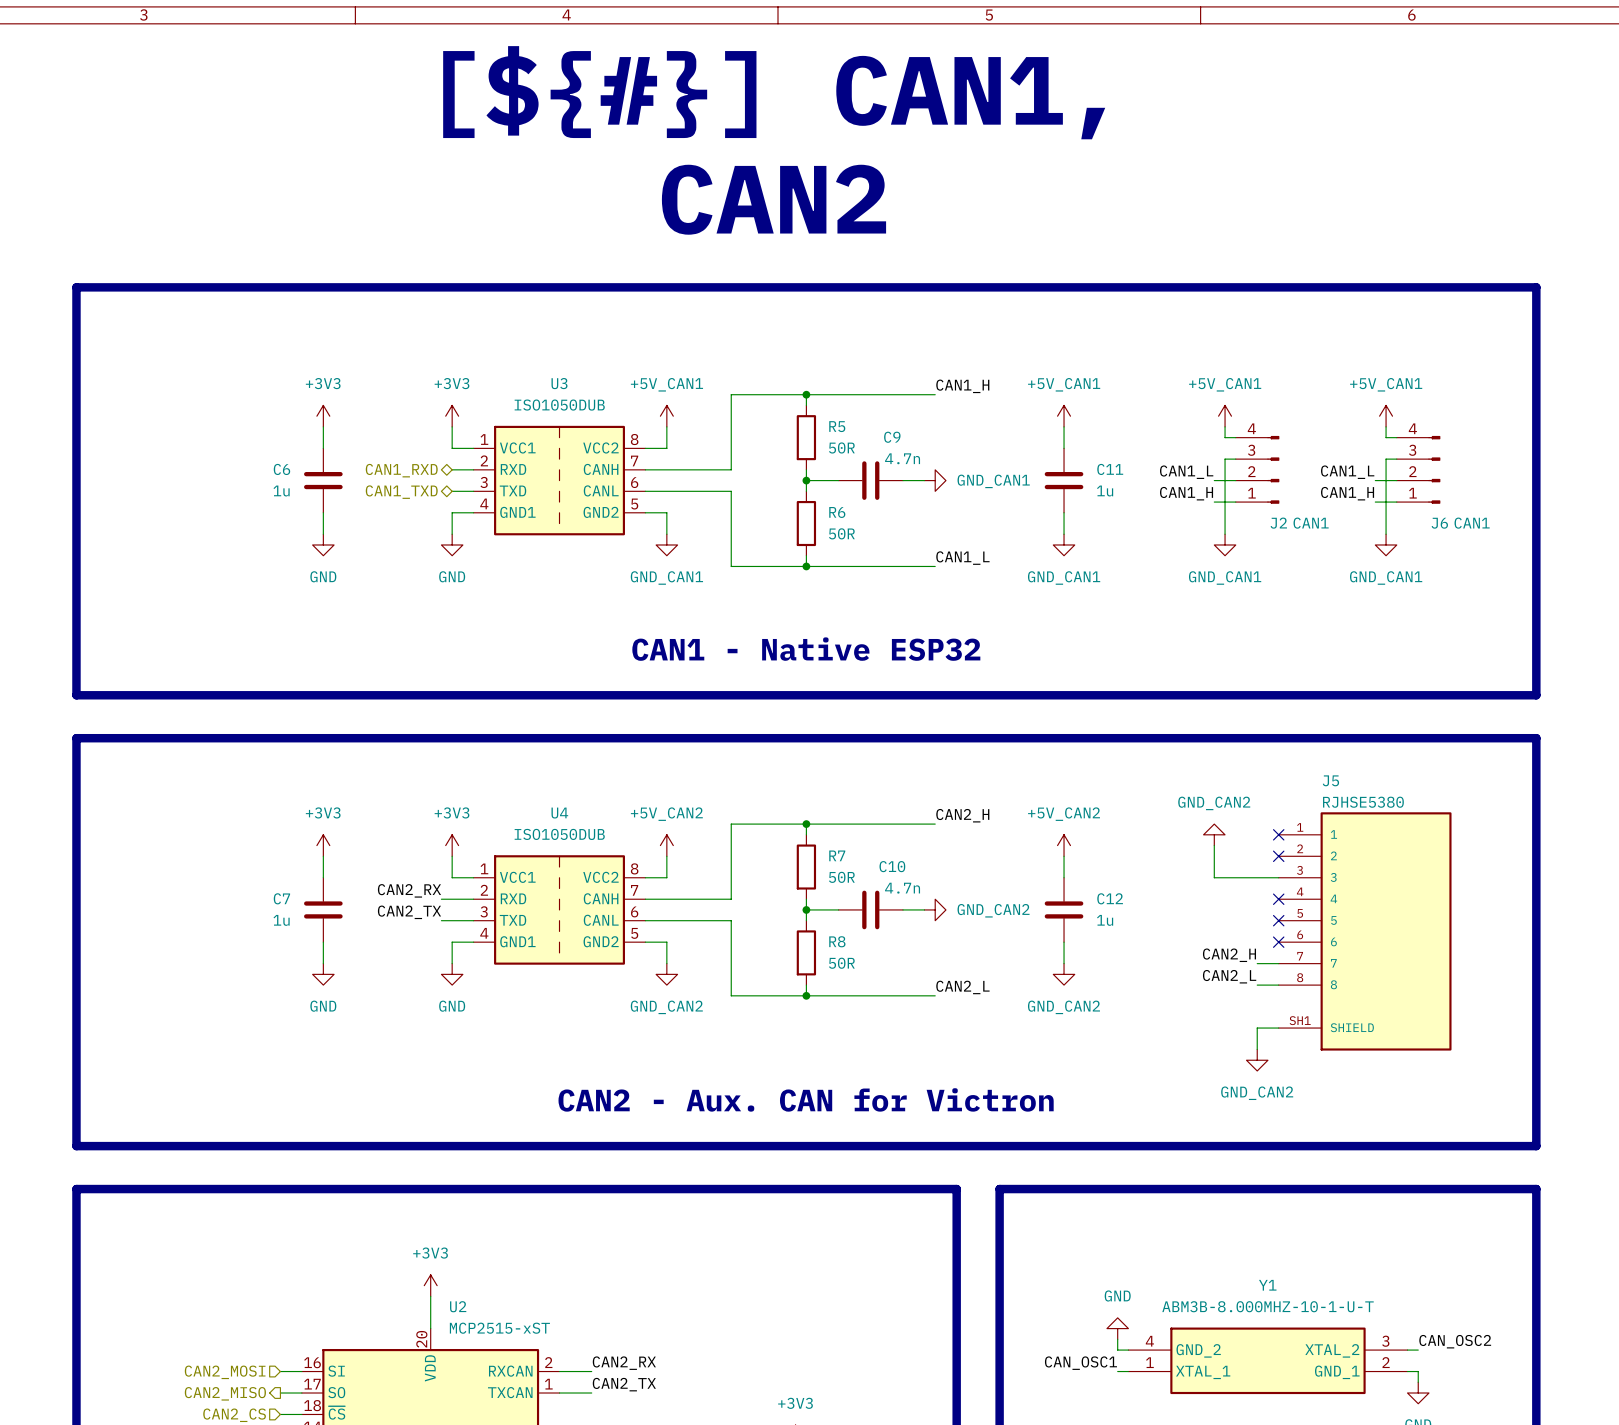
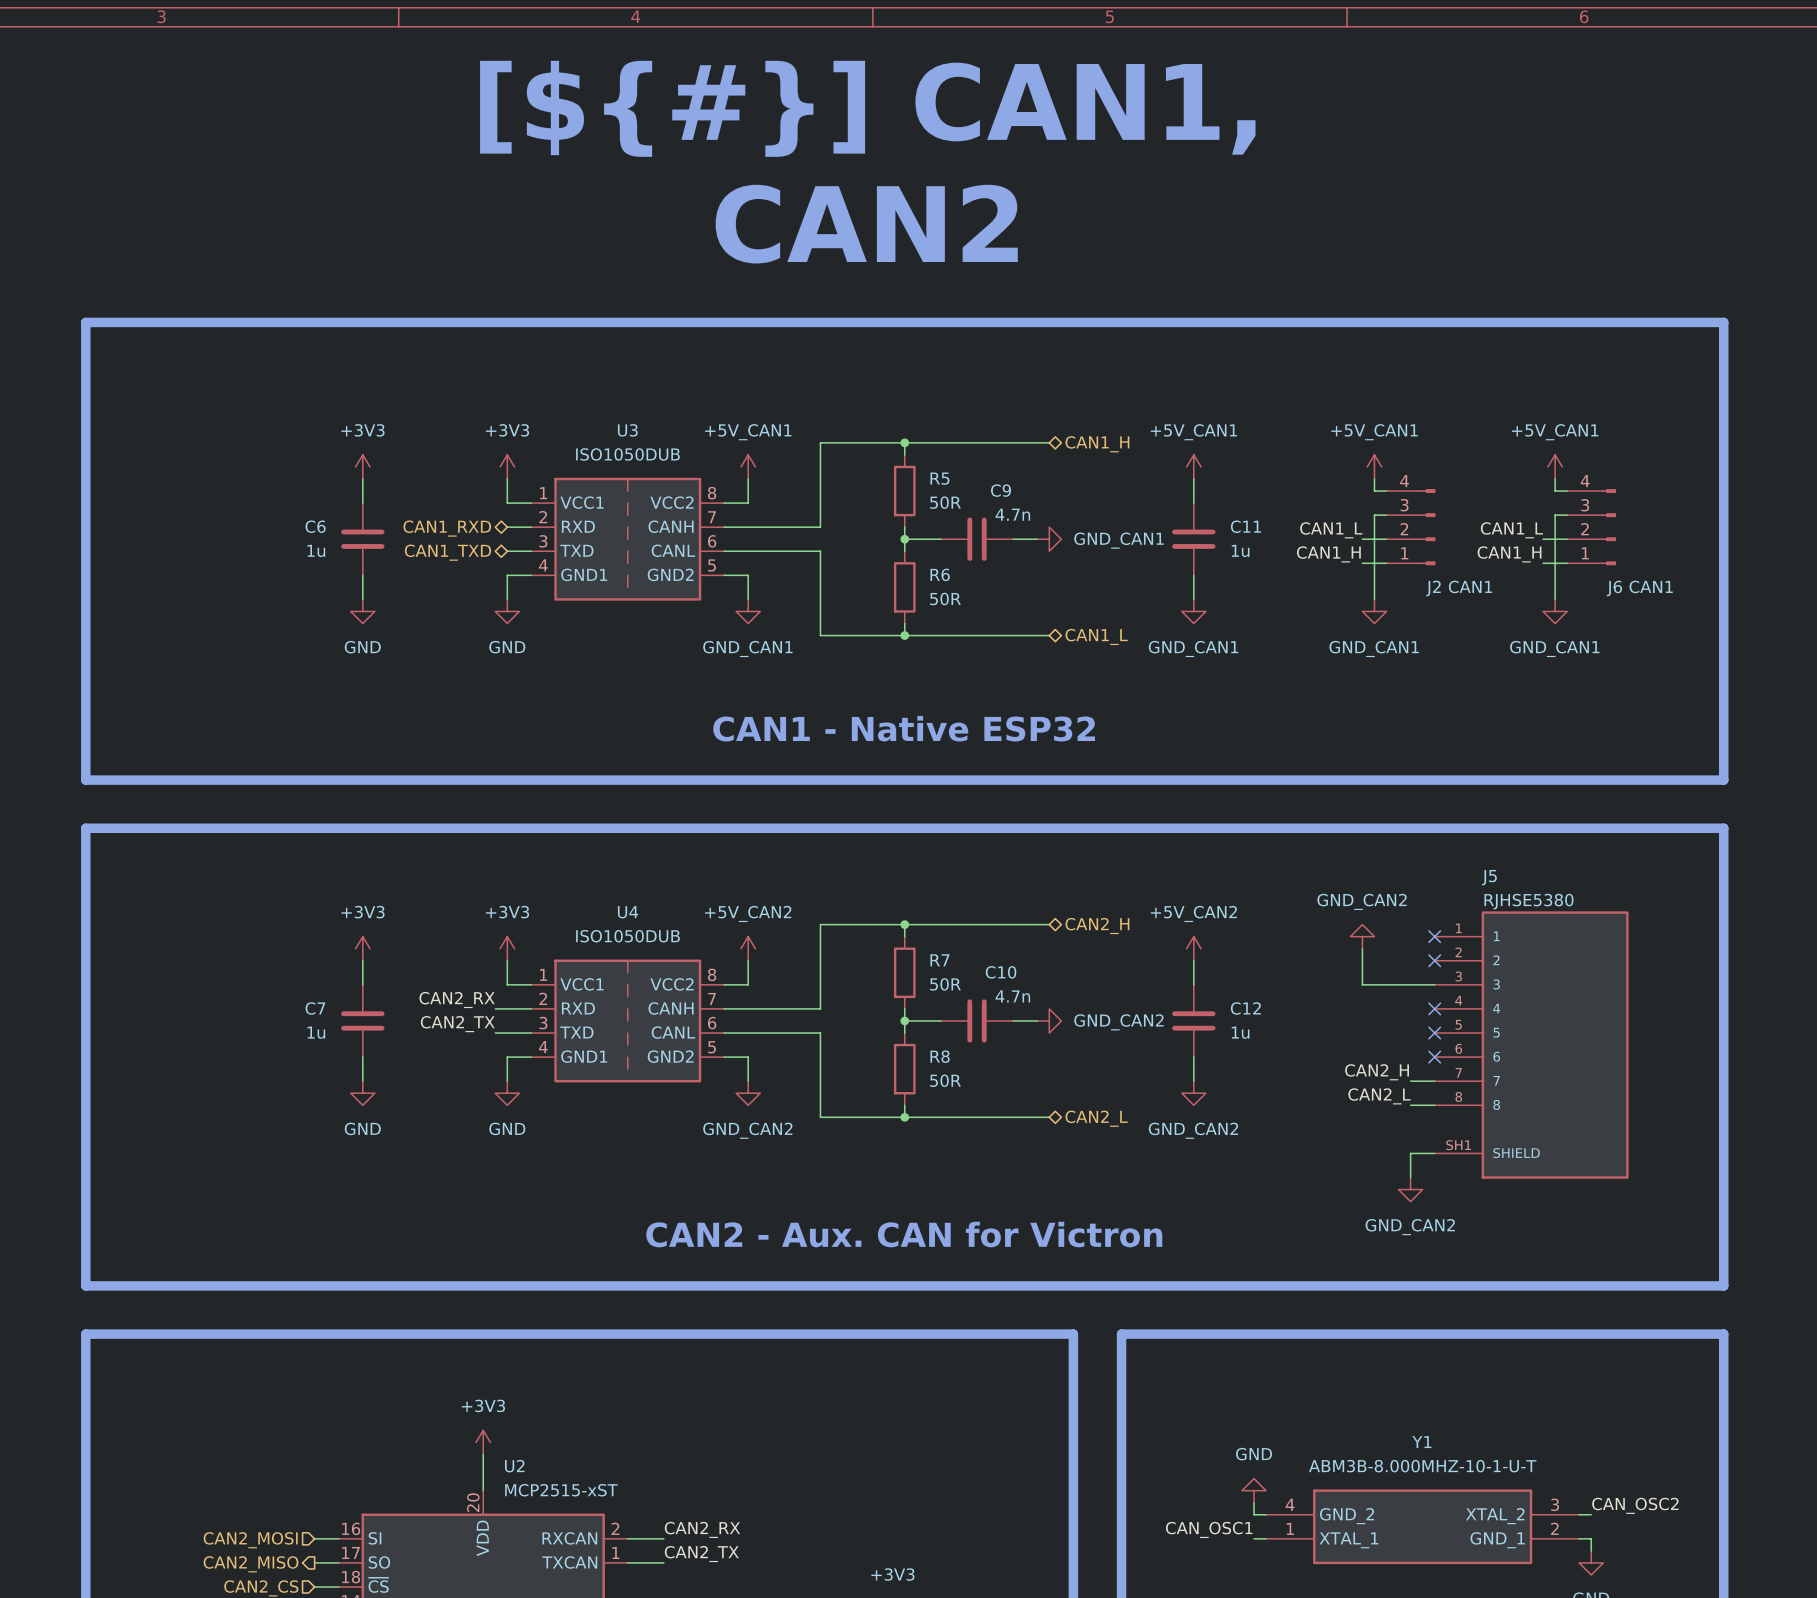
label: CAN1_H (962, 386) -> none
hierarchical label: none -> CAN1_H (1097, 444)
label: CAN1_L (962, 558) -> none
hierarchical label: none -> CAN1_L (1096, 636)
label: CAN2_H (962, 815) -> none
hierarchical label: none -> CAN2_H (1097, 926)
label: CAN2_L (962, 987) -> none
hierarchical label: none -> CAN2_L (1096, 1118)

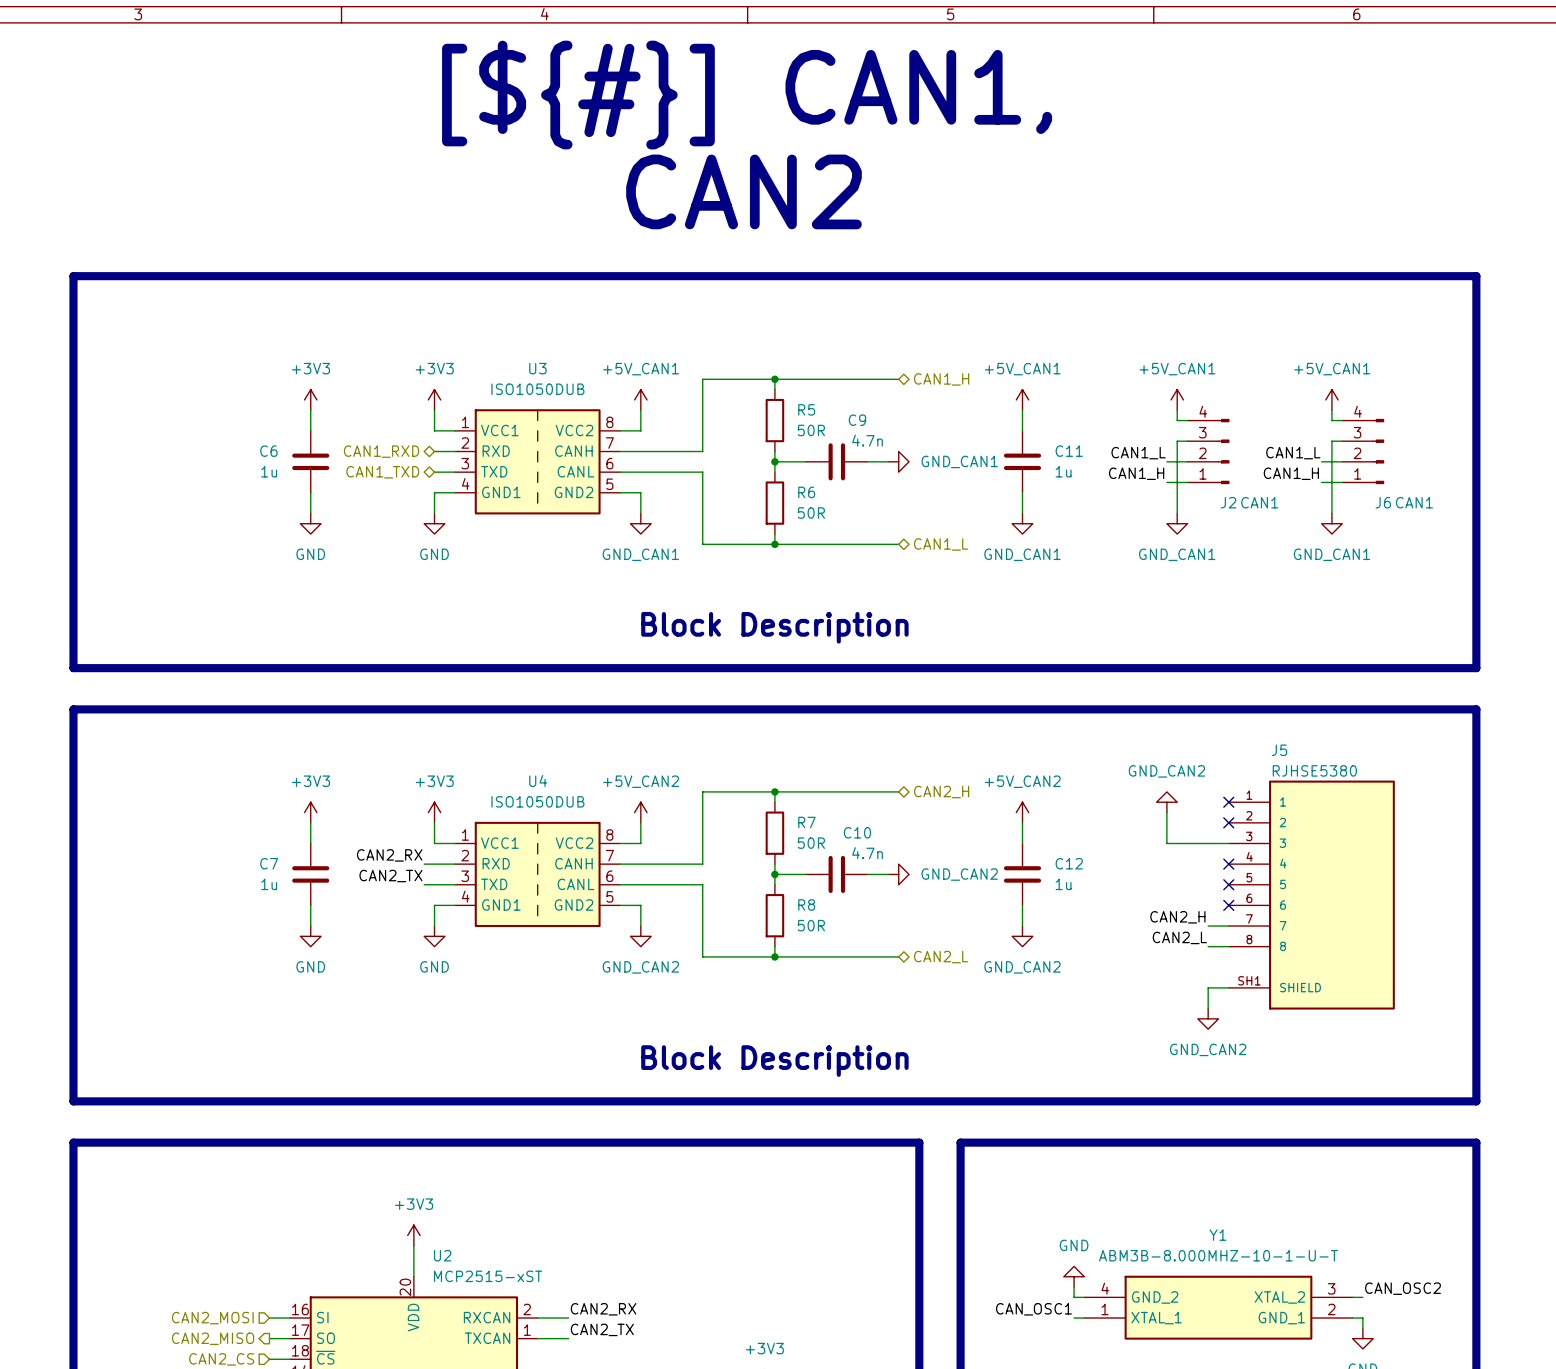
text: CAN1 - Native ESP32 (904, 728) -> Block Description (774, 627)
text: CAN2 - Aux. CAN for Victron (904, 1234) -> Block Description (774, 1061)

